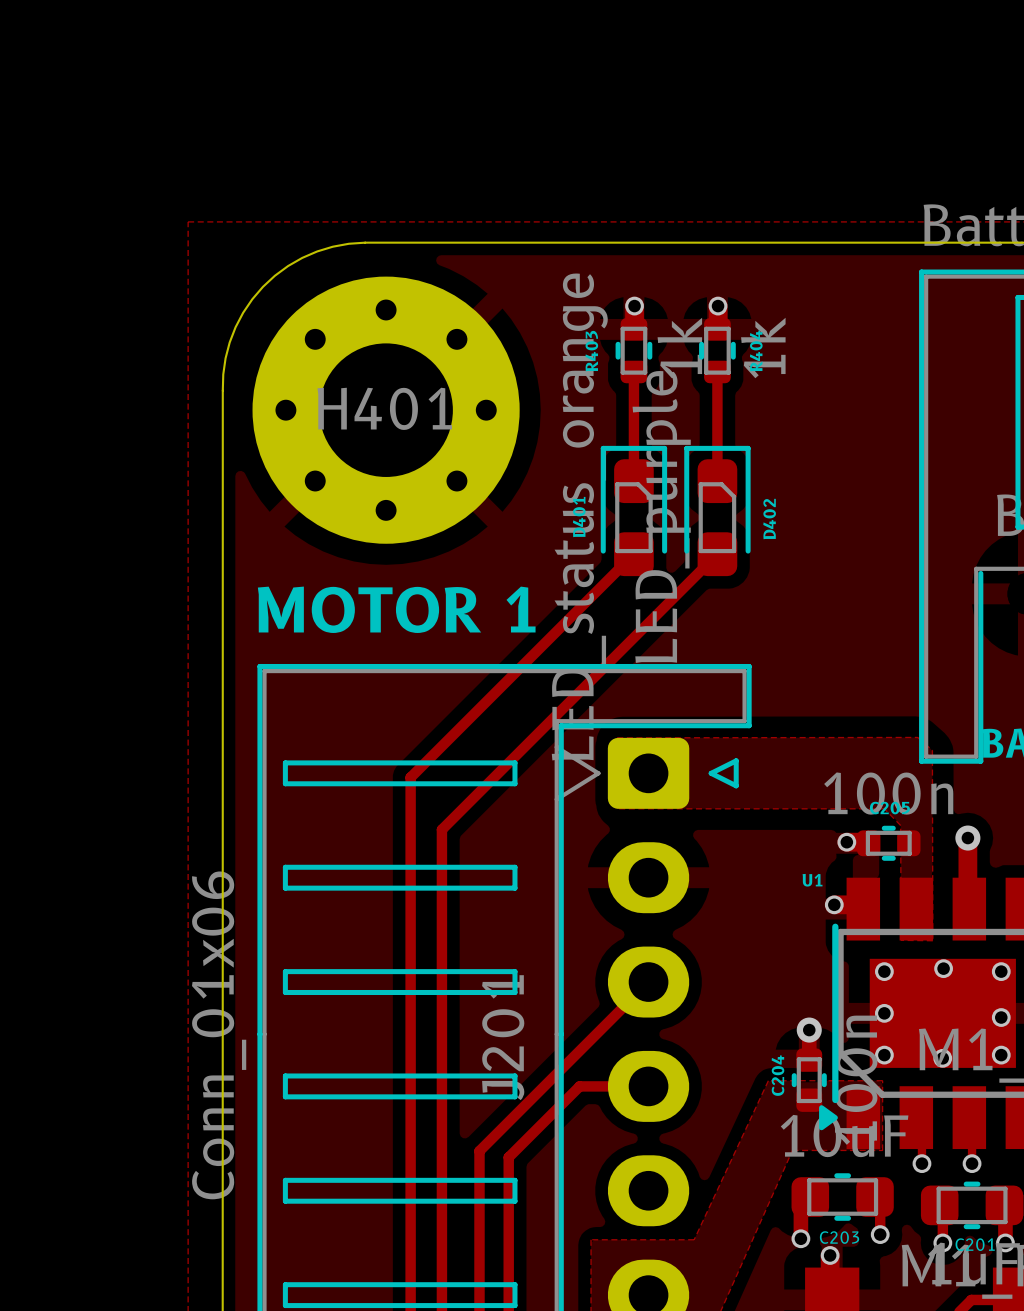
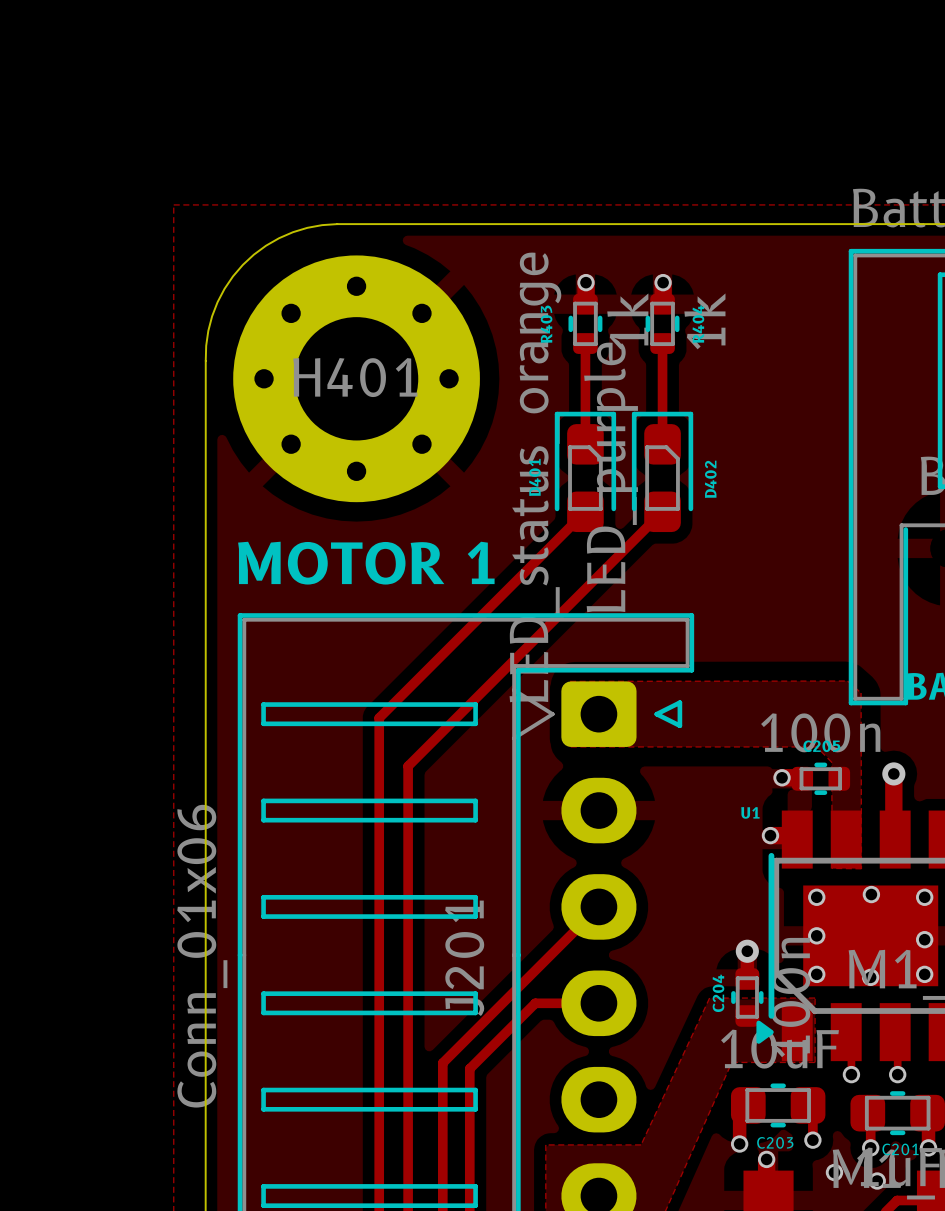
via: none -> (834, 1172)
via: none -> (877, 1181)

